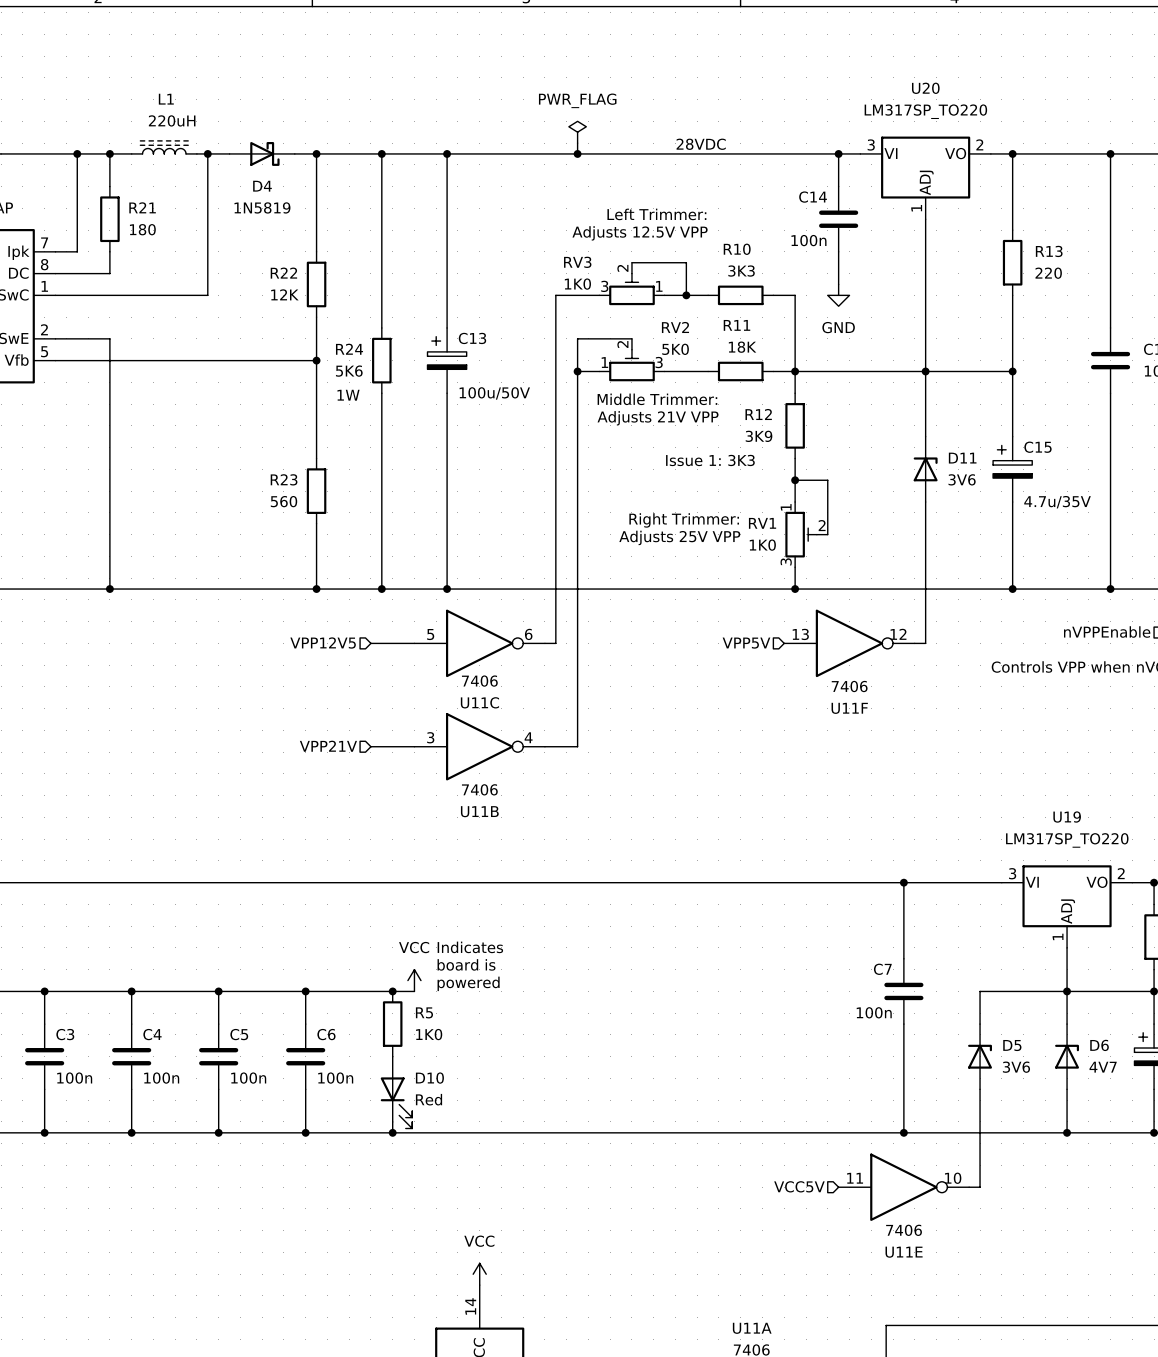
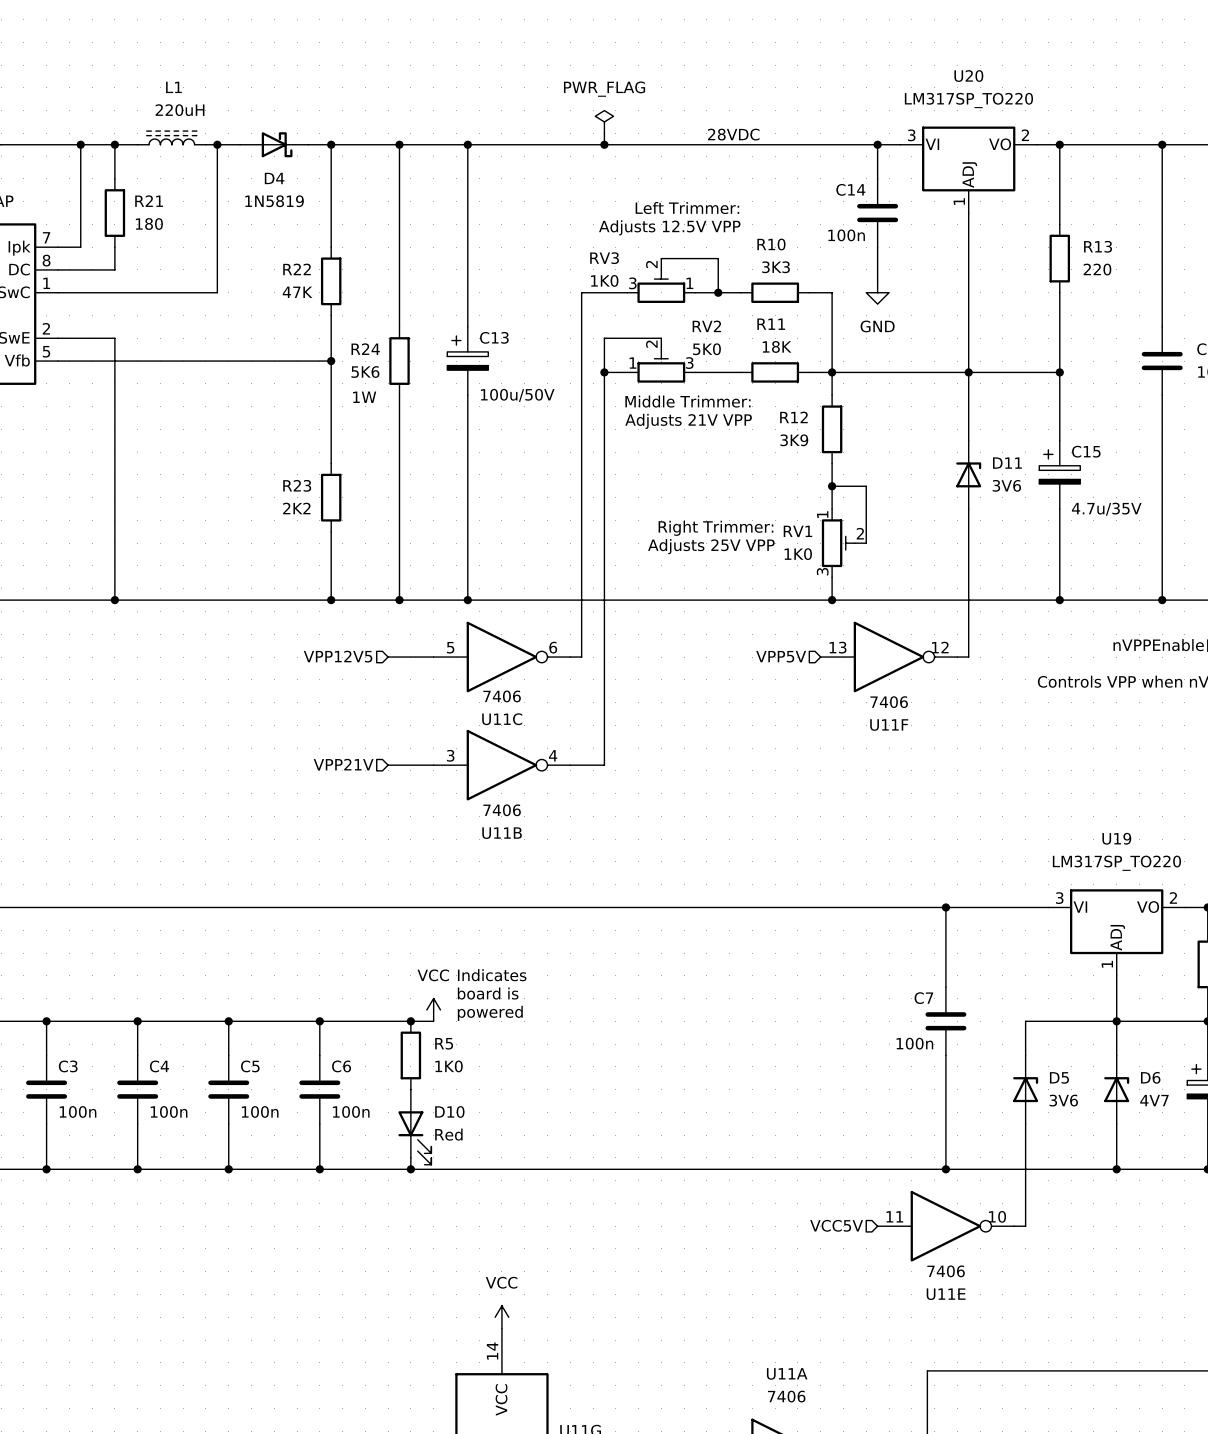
R22 value: 12K (284, 294) -> 47K (297, 292)
text: Issue 1: 3K3 (710, 460) -> none
R23 value: 560 (284, 501) -> 2K2 (296, 508)

